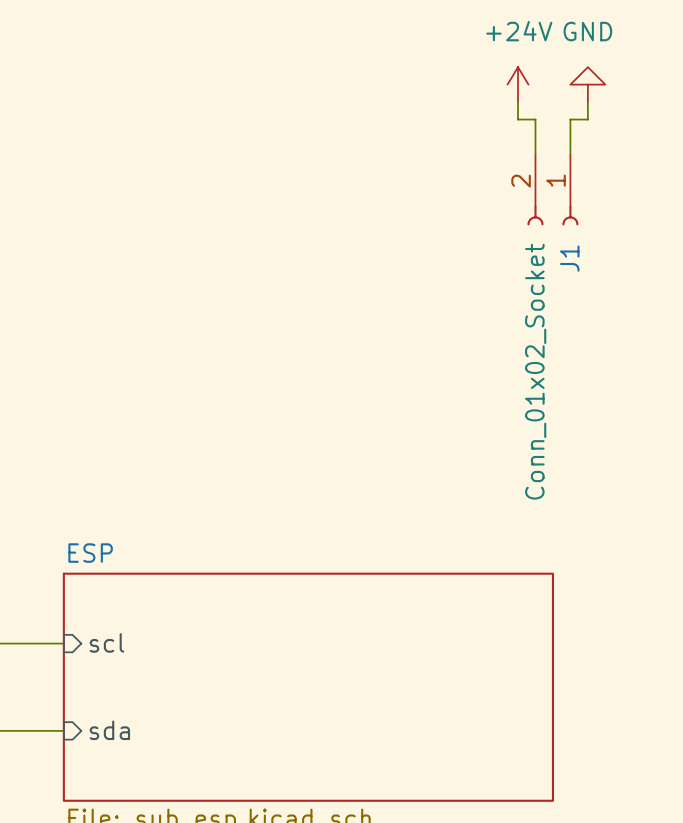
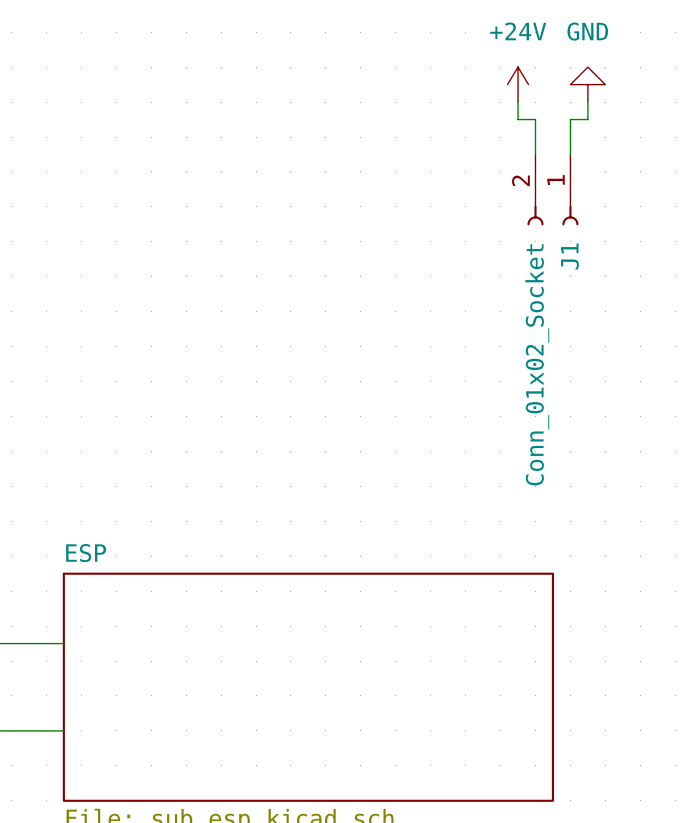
sheet pin: scl (106, 642) -> none
sheet pin: sda (109, 730) -> none

